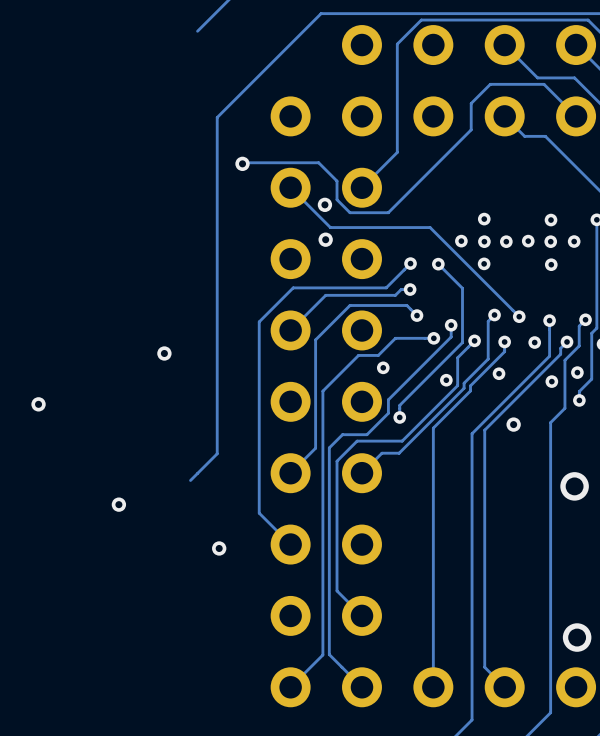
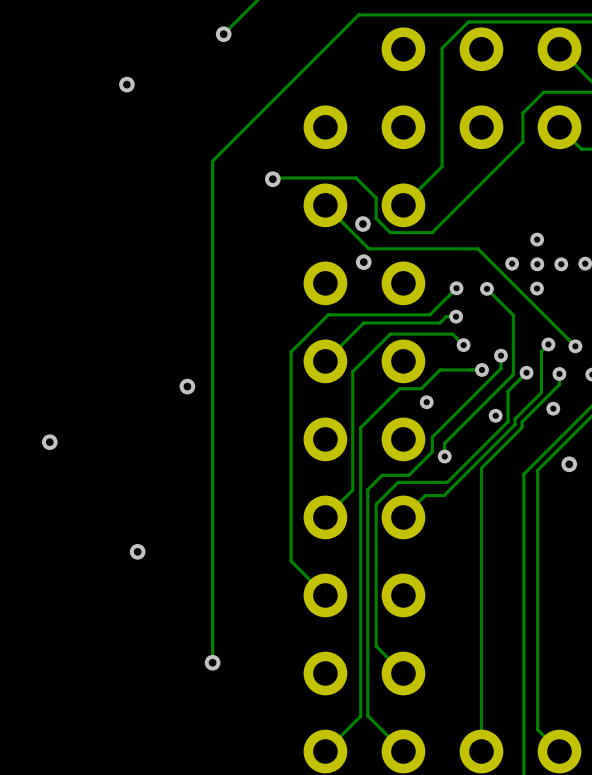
via: none -> (223, 34)
via: none -> (126, 84)
track: (217, 117) (217, 453) (190, 480) -> (245, 128) (212, 161) (212, 662)
via position: (219, 548) -> (212, 662)

